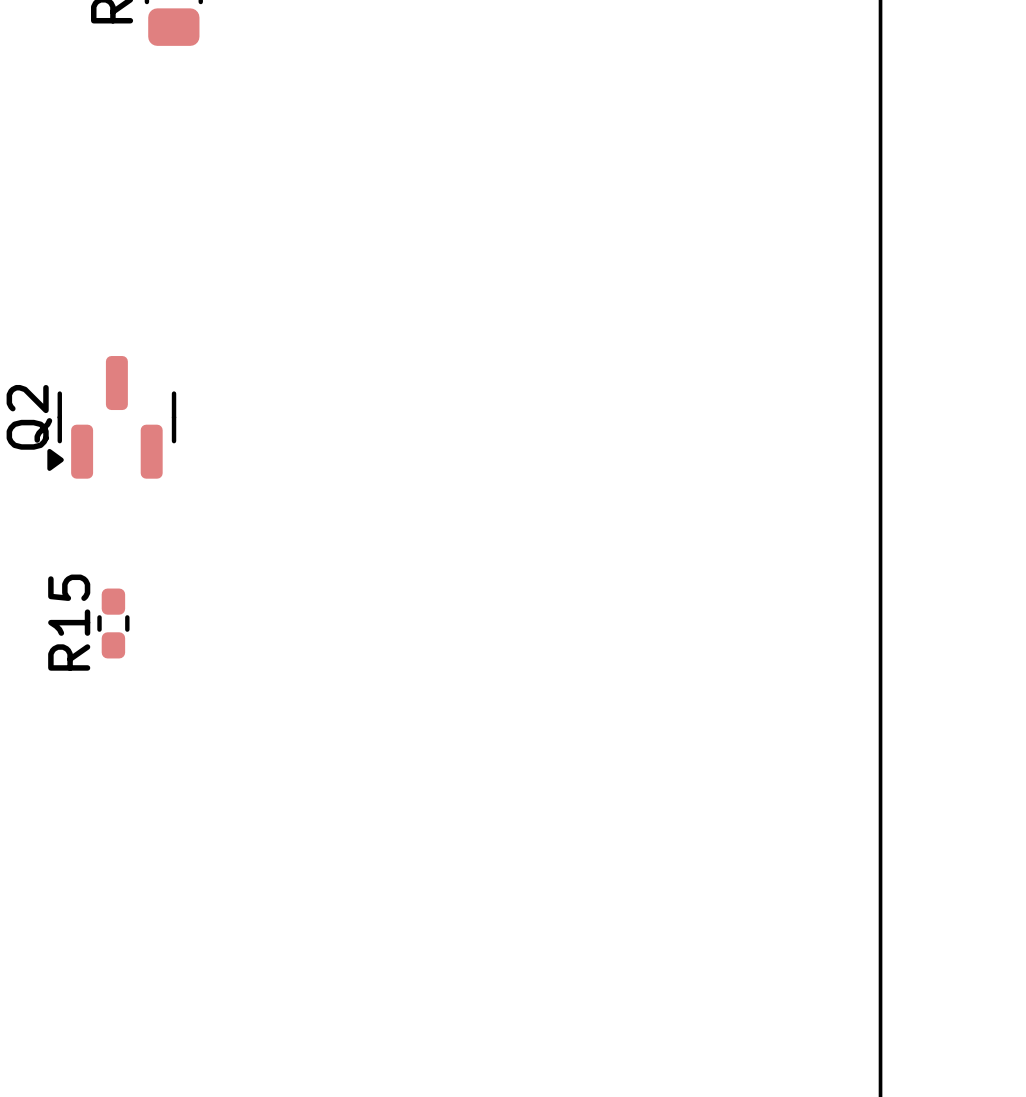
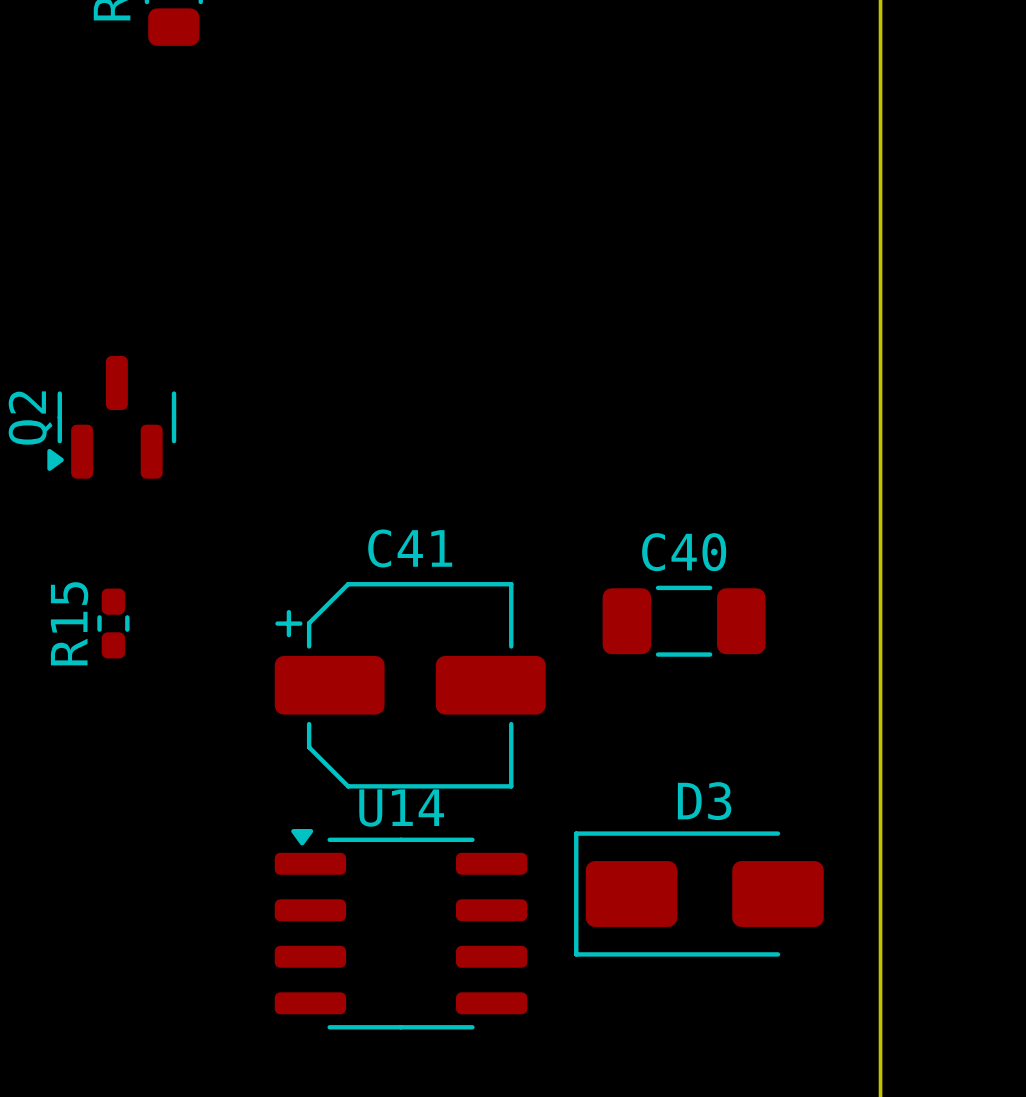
C40: none -> (684, 621)
C41: none -> (410, 685)
D3: none -> (698, 894)
U14: none -> (401, 929)

